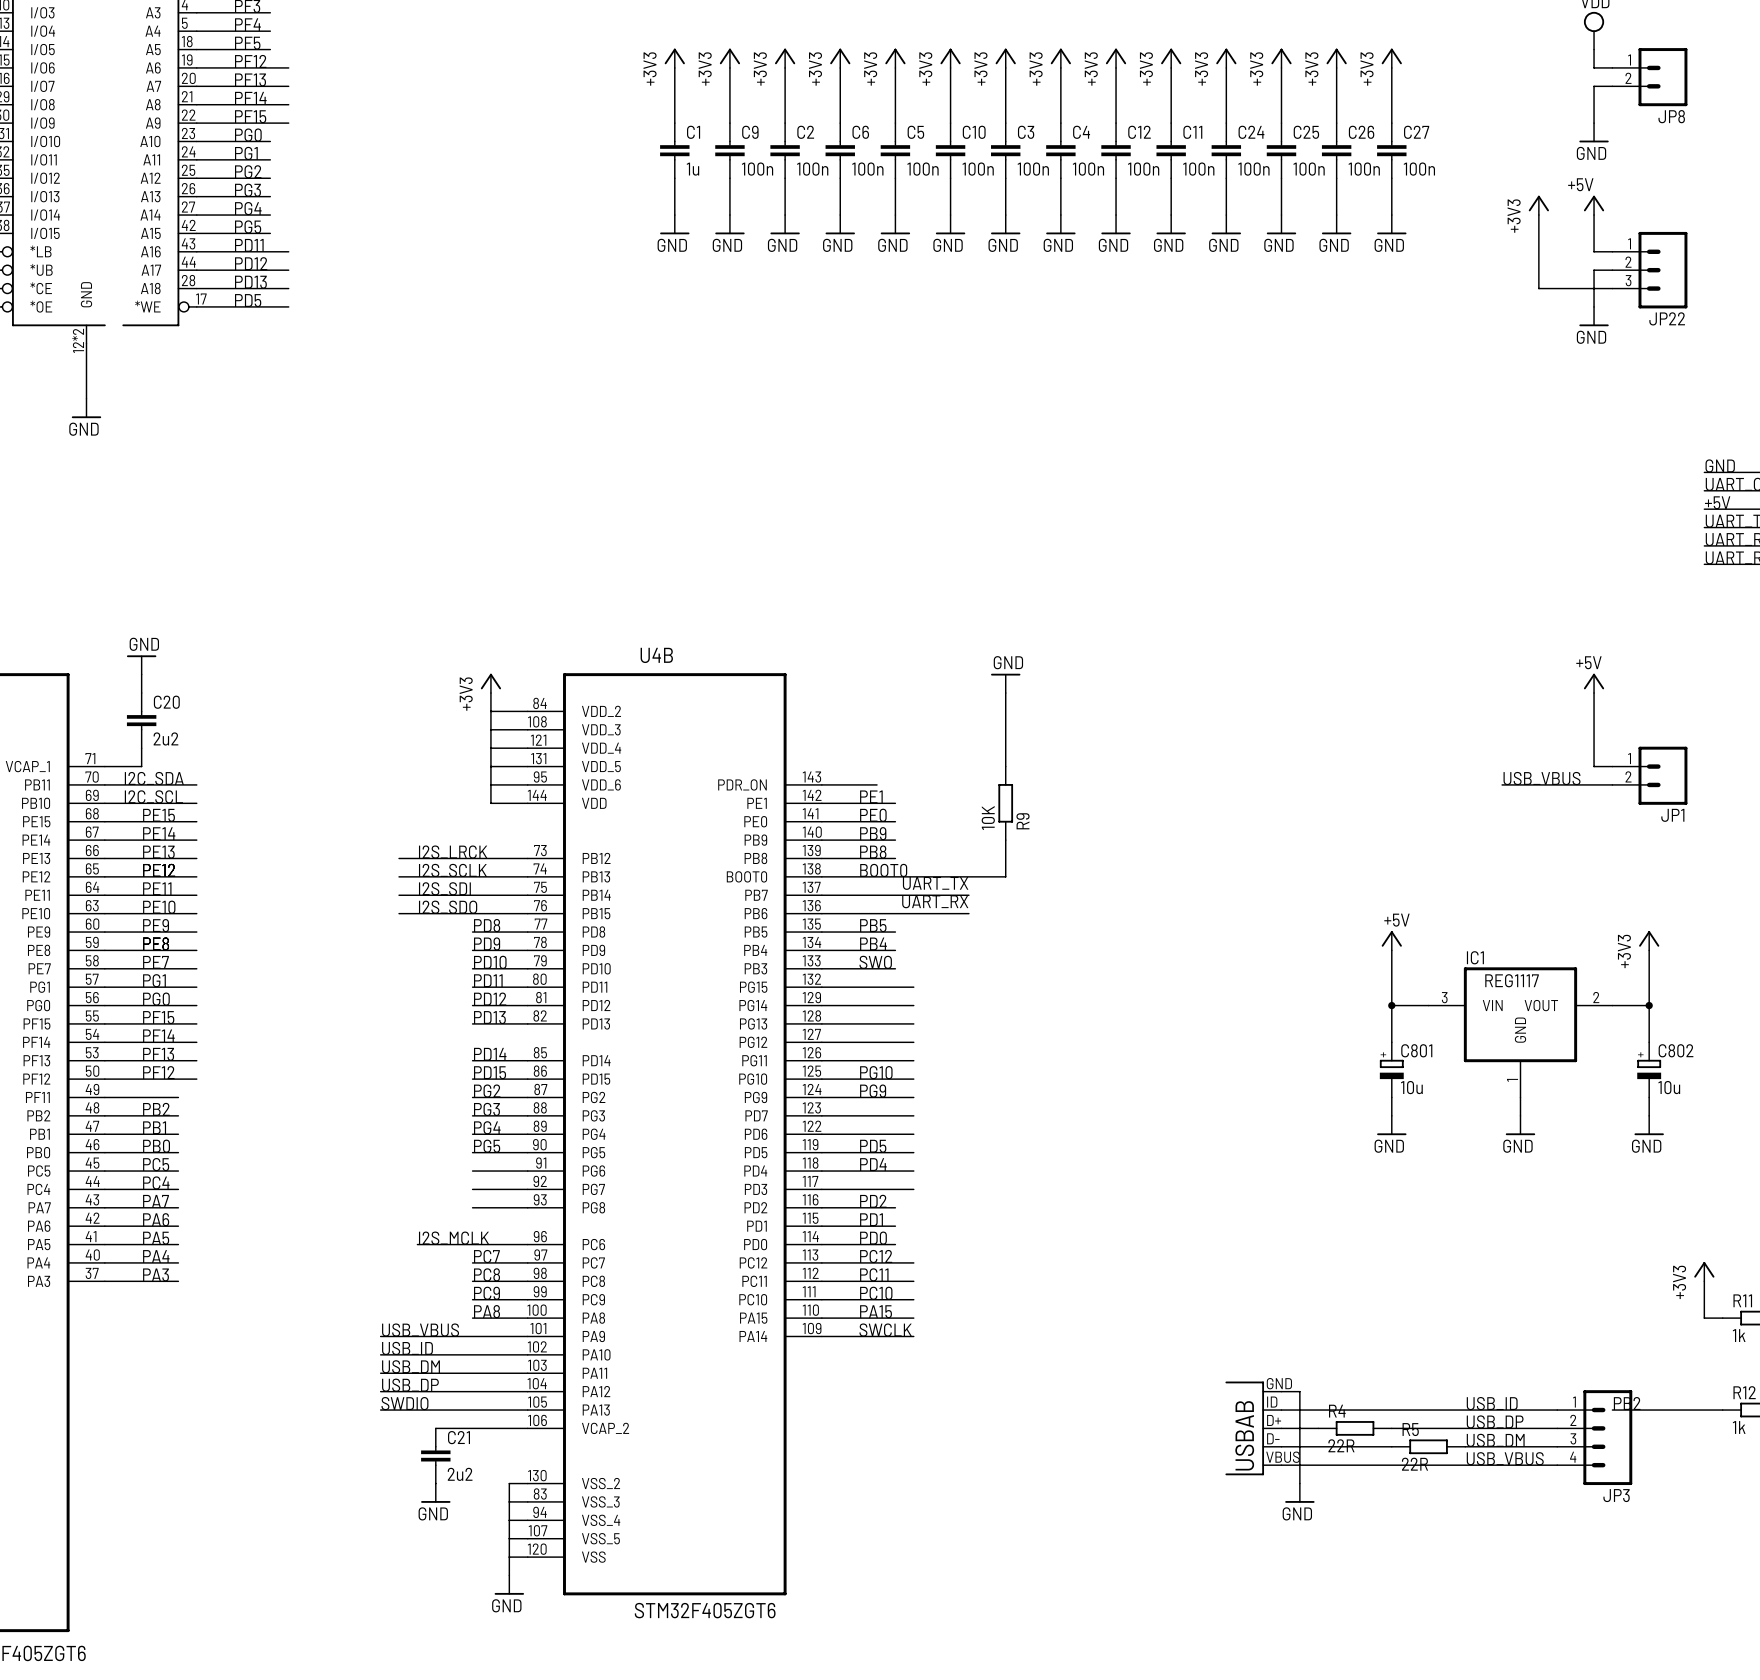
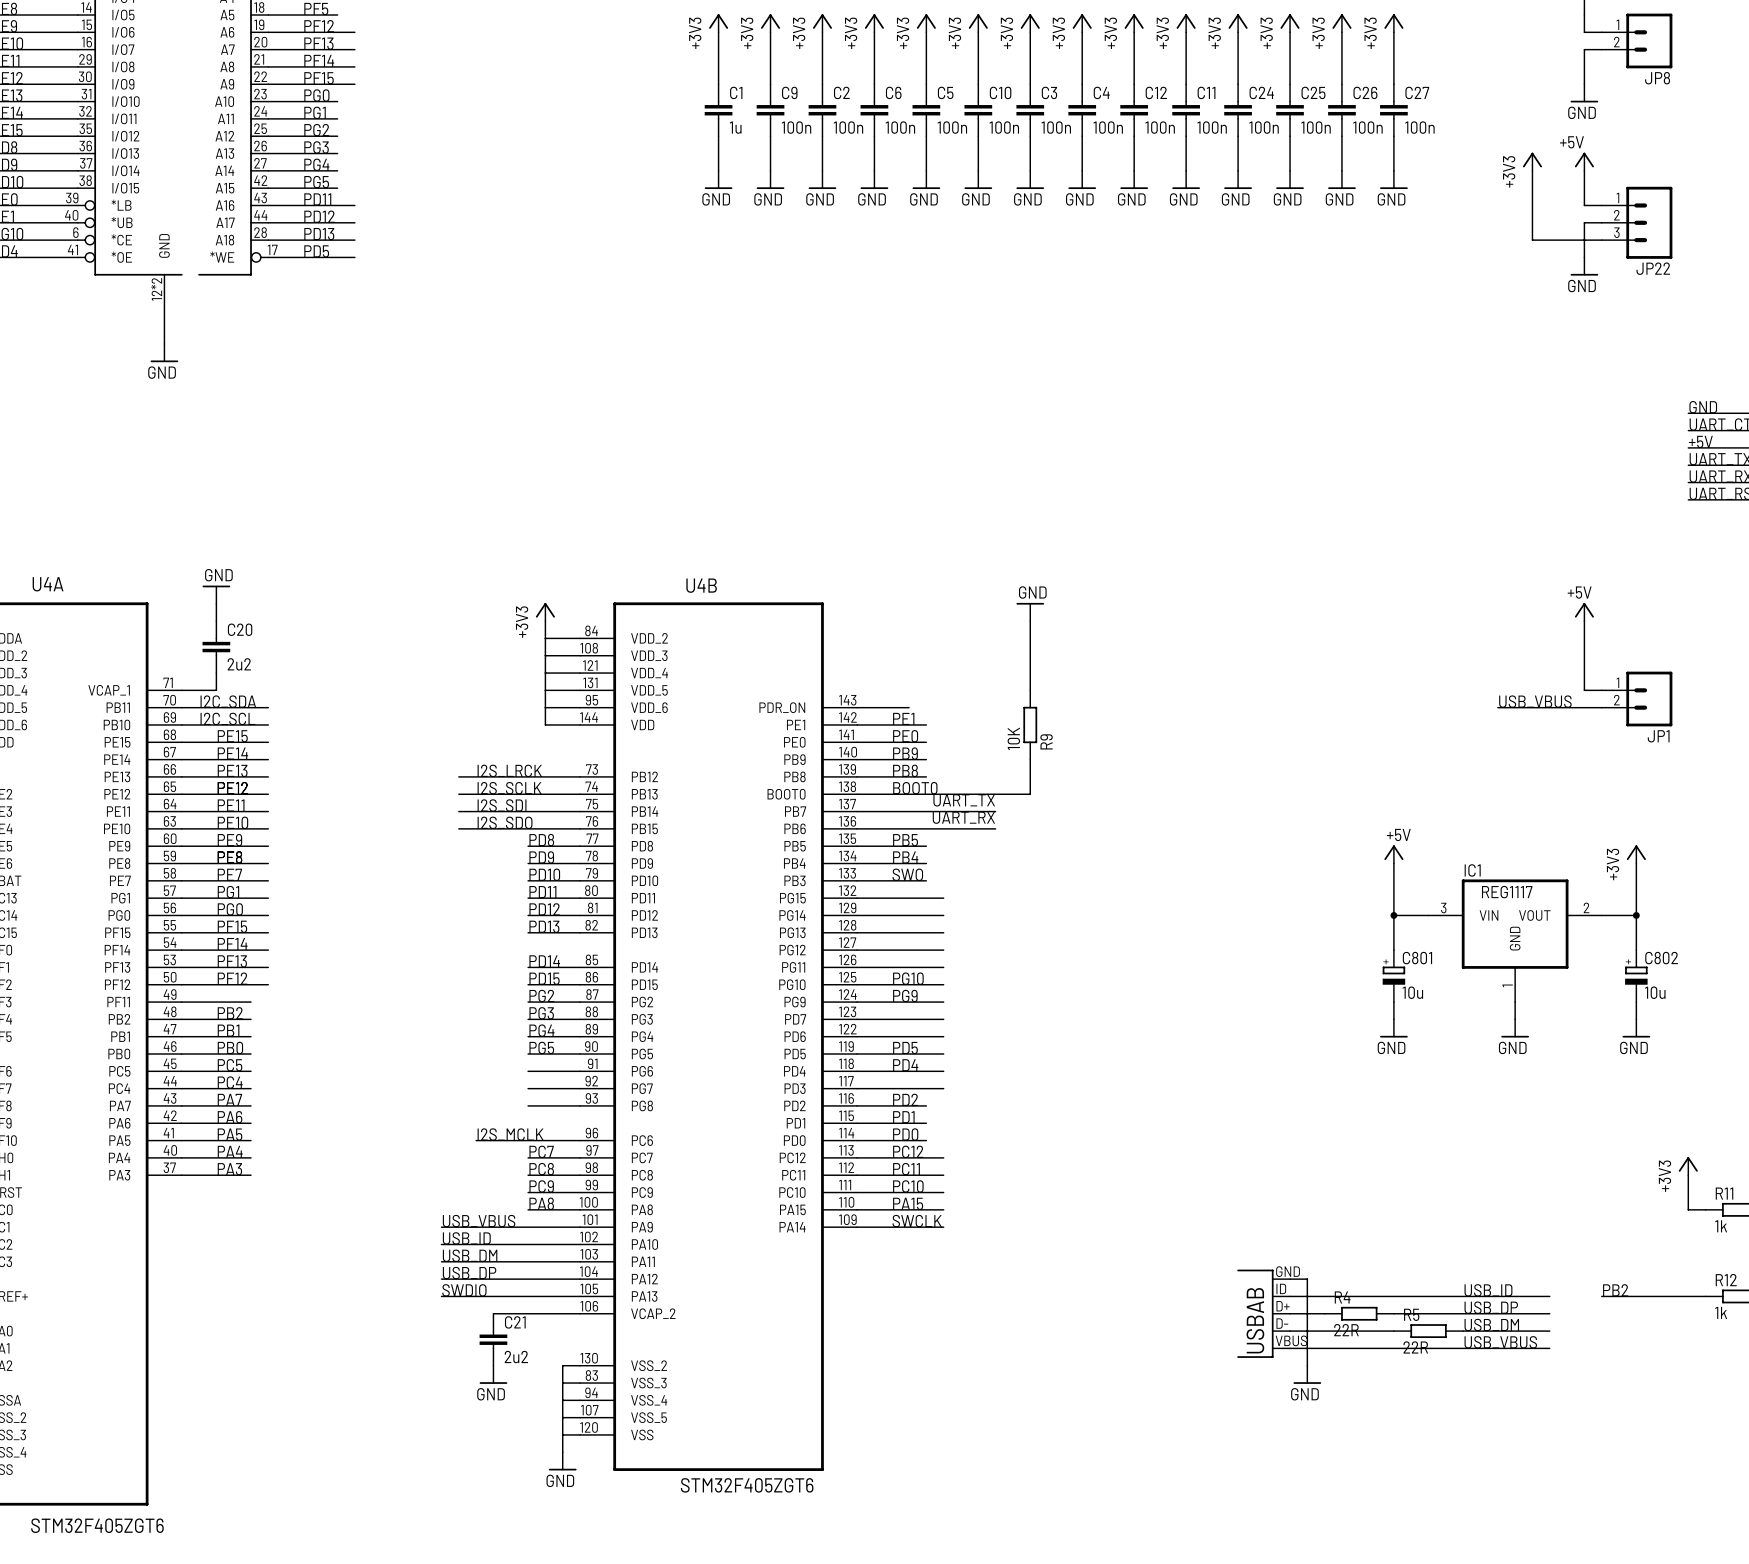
JP3: (1594, 1437) -> none

